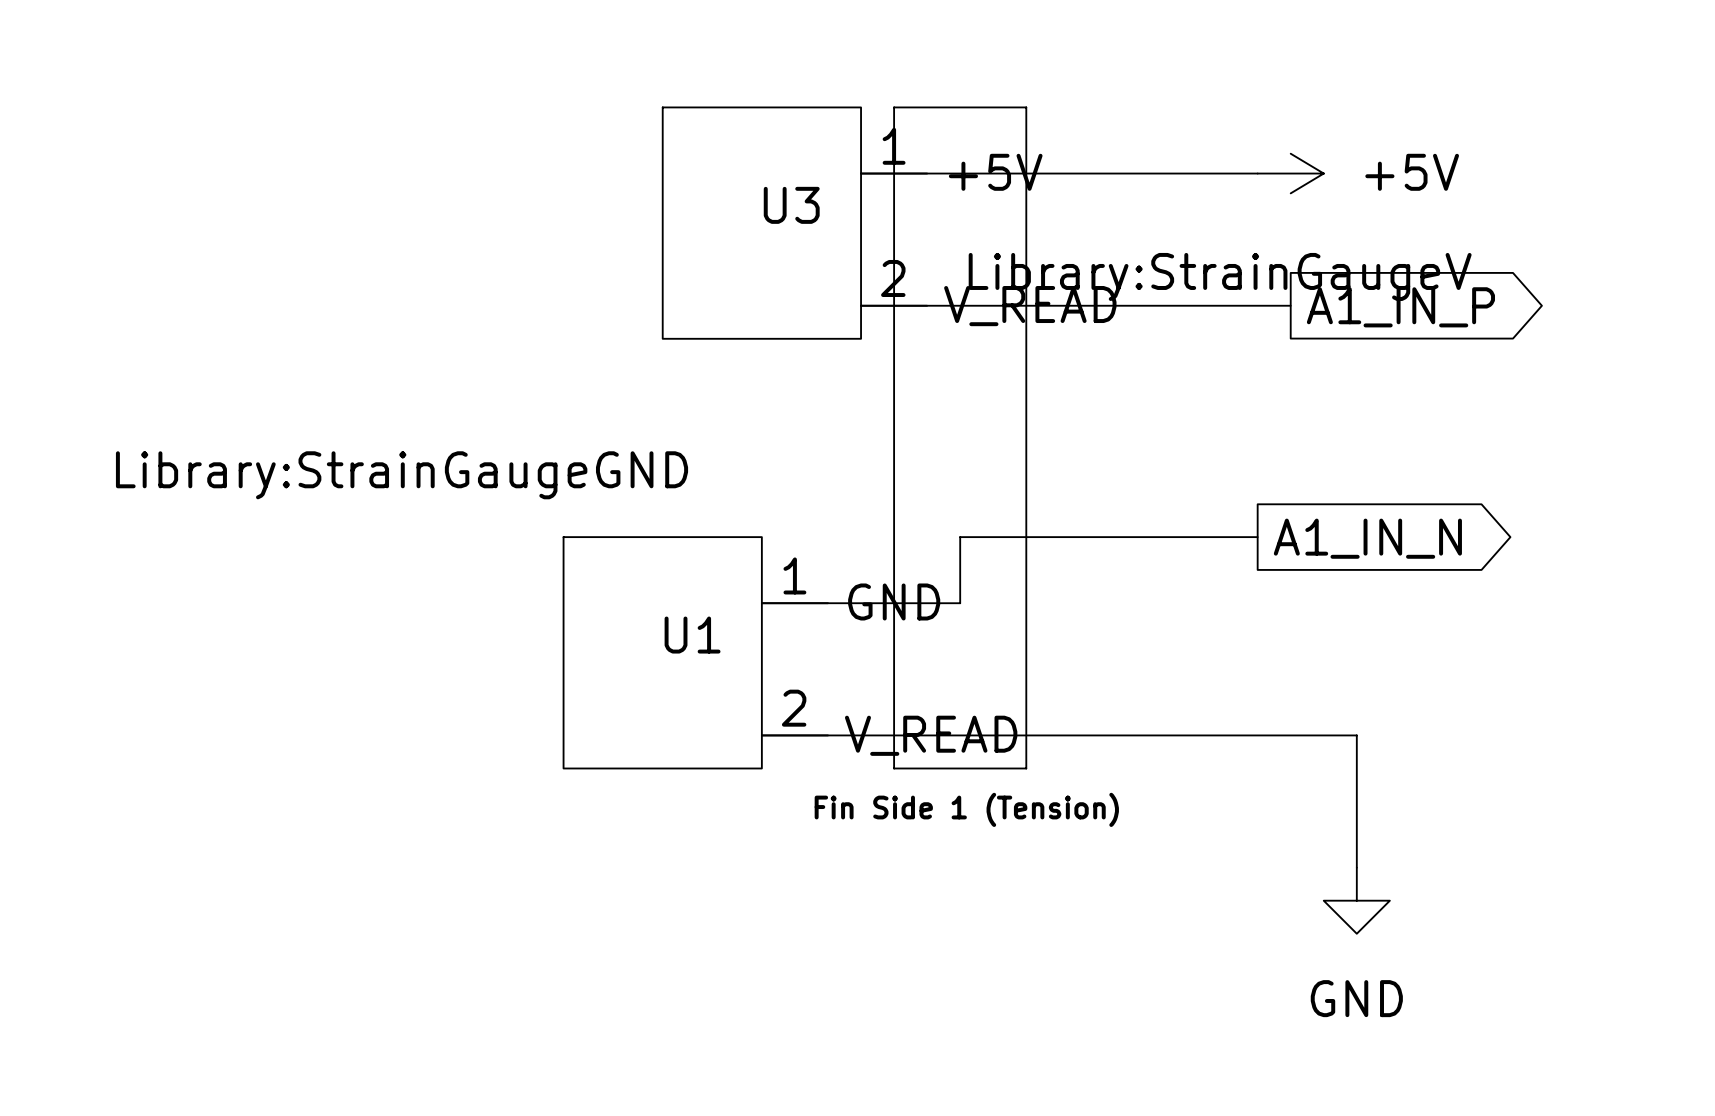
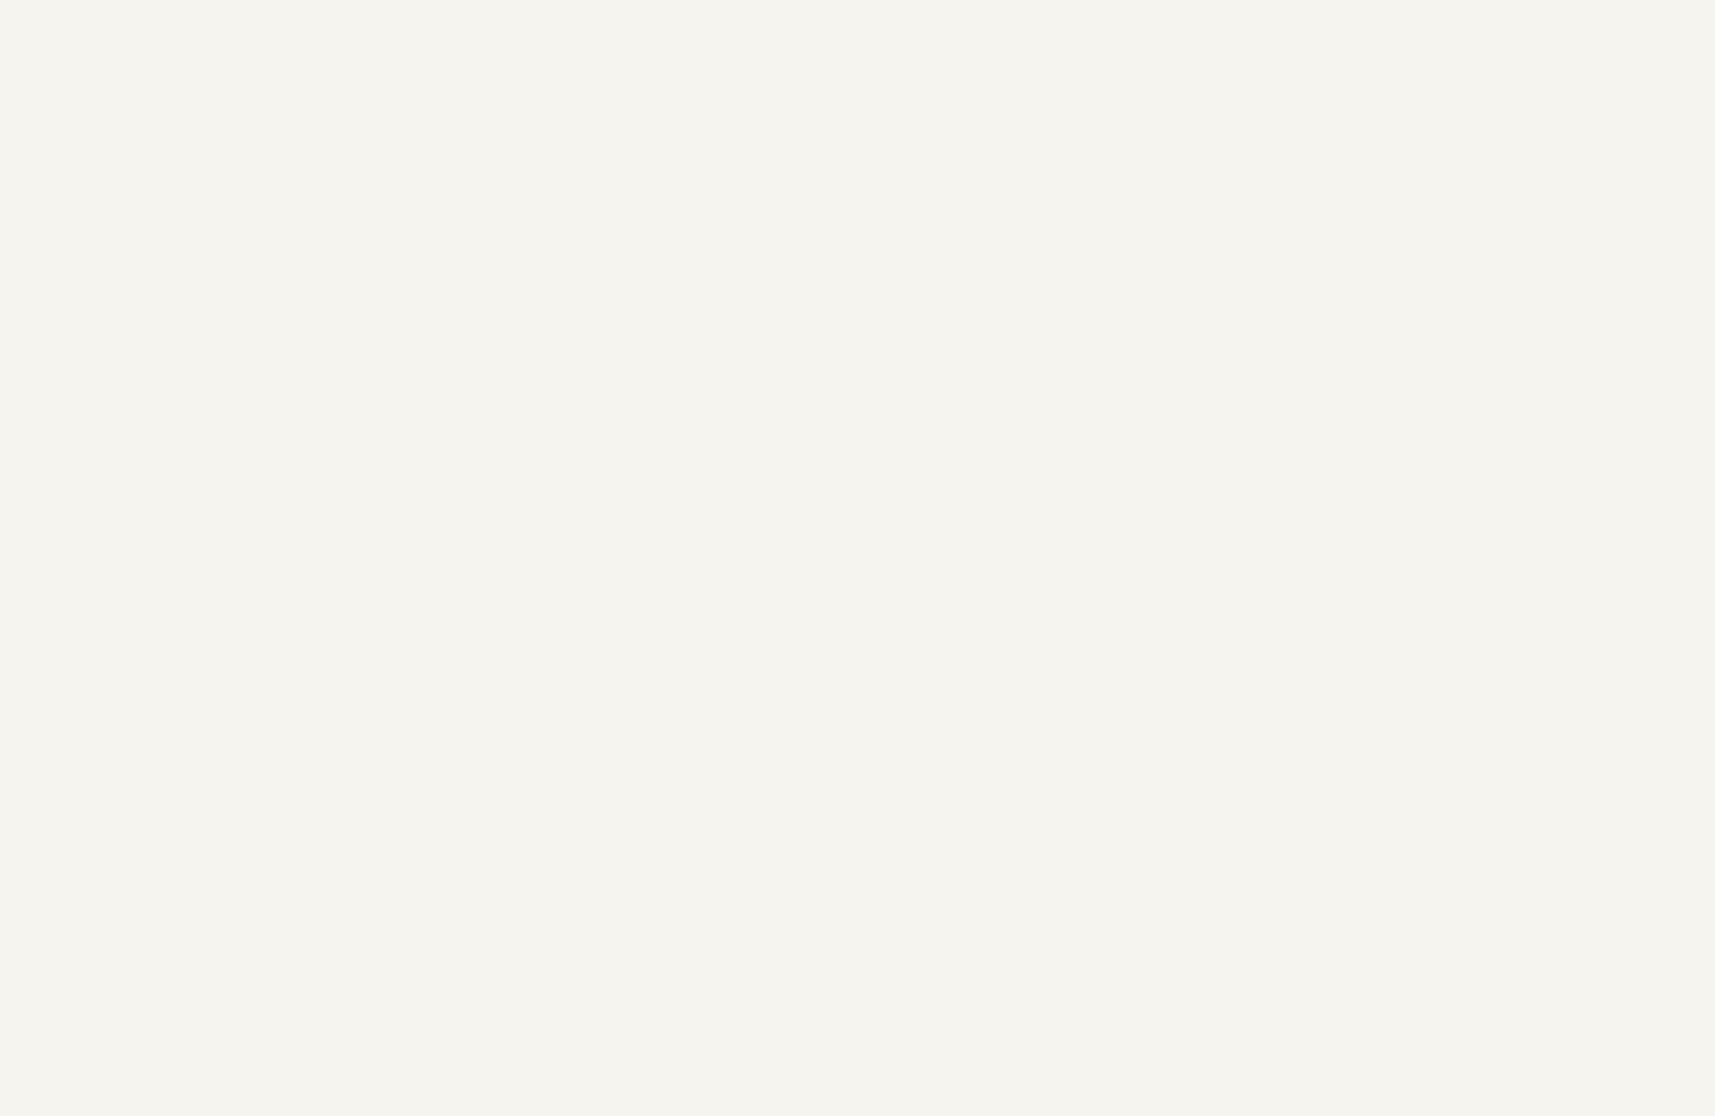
line: (894, 107) (1026, 107) (1026, 768) (894, 768) (894, 107) -> none
wire: (861, 173) (1257, 173) -> none
power symbol: +5V (1290, 173) -> none
U3: (794, 223) -> none
wire: (861, 305) (1290, 305) -> none
global label: A1_IN_P (1400, 307) -> none
wire: (1257, 537) (960, 537) (960, 603) (761, 603) -> none
global label: A1_IN_N (1367, 538) -> none
U1: (695, 652) -> none
wire: (761, 735) (1356, 735) (1356, 867) -> none
text: Fin Side 1 (Tension) (966, 809) -> none
power symbol: GND (1356, 900) -> none

